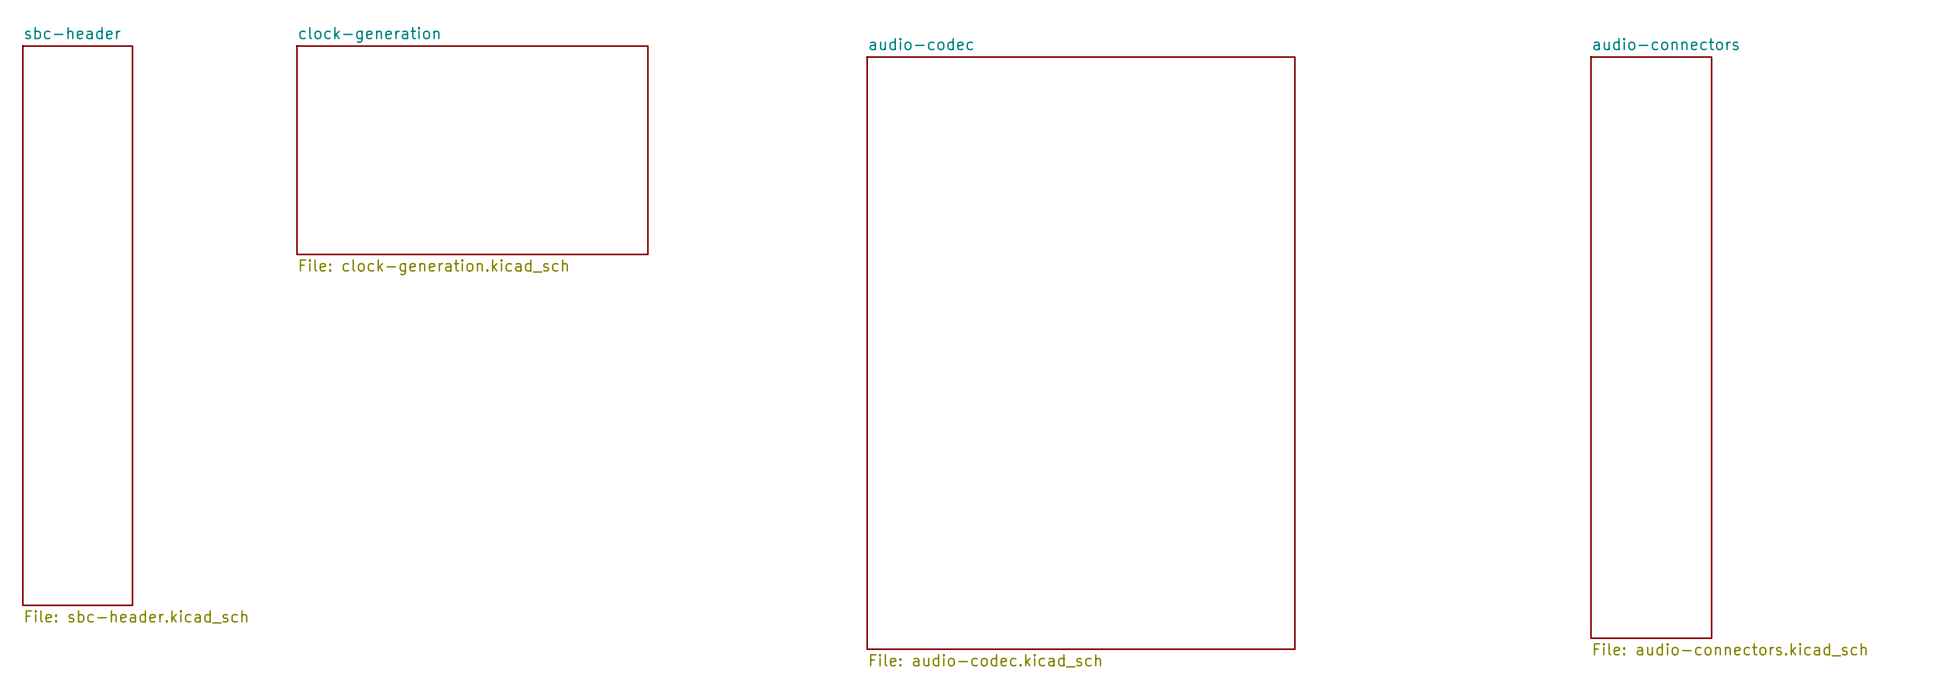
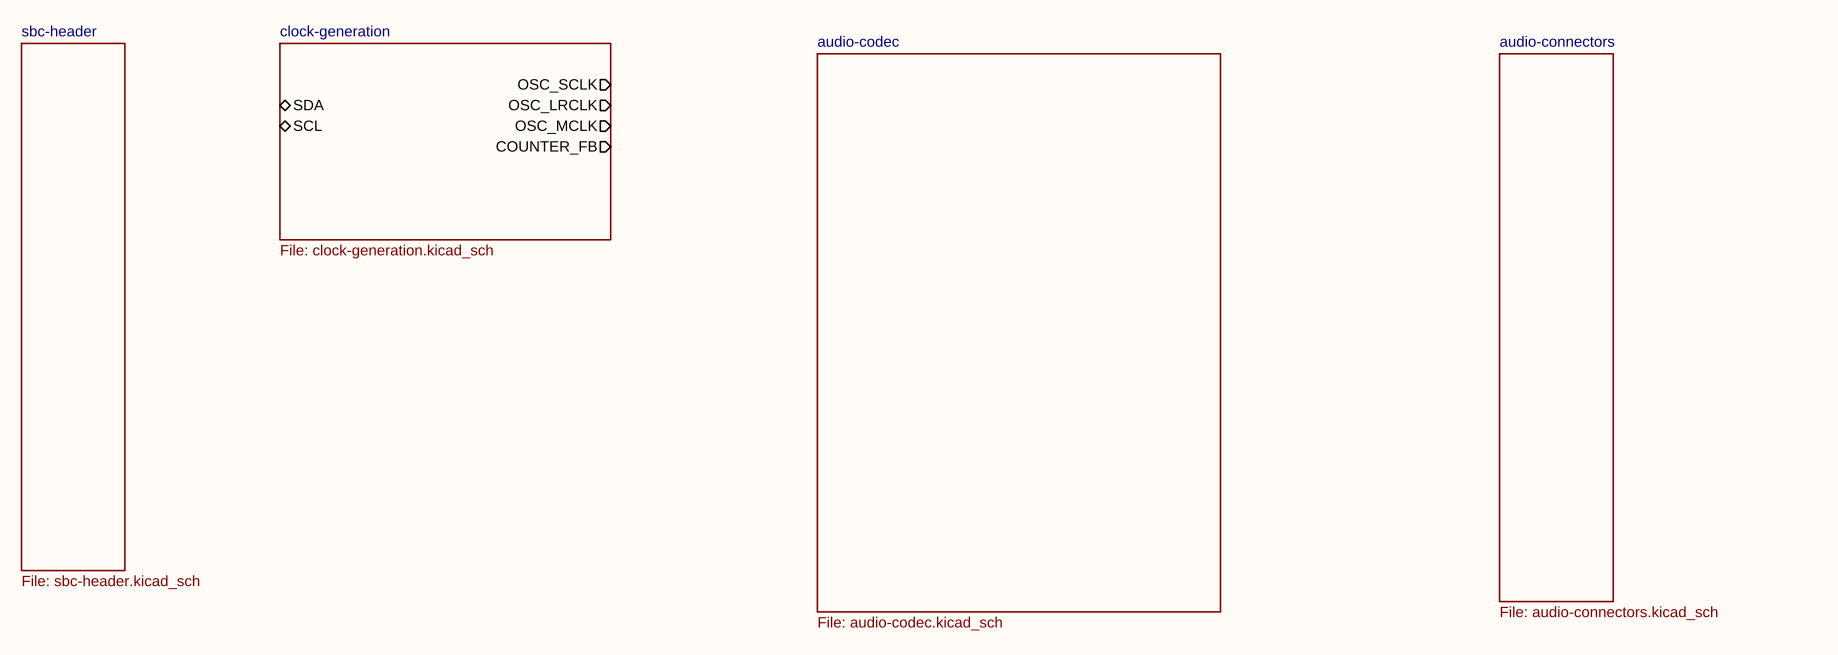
sheet pin: none -> OSC_SCLK (557, 85)
sheet pin: none -> SDA (308, 105)
sheet pin: none -> OSC_LRCLK (553, 106)
sheet pin: none -> SCL (307, 125)
sheet pin: none -> OSC_MCLK (556, 127)
sheet pin: none -> COUNTER_FB (546, 147)

